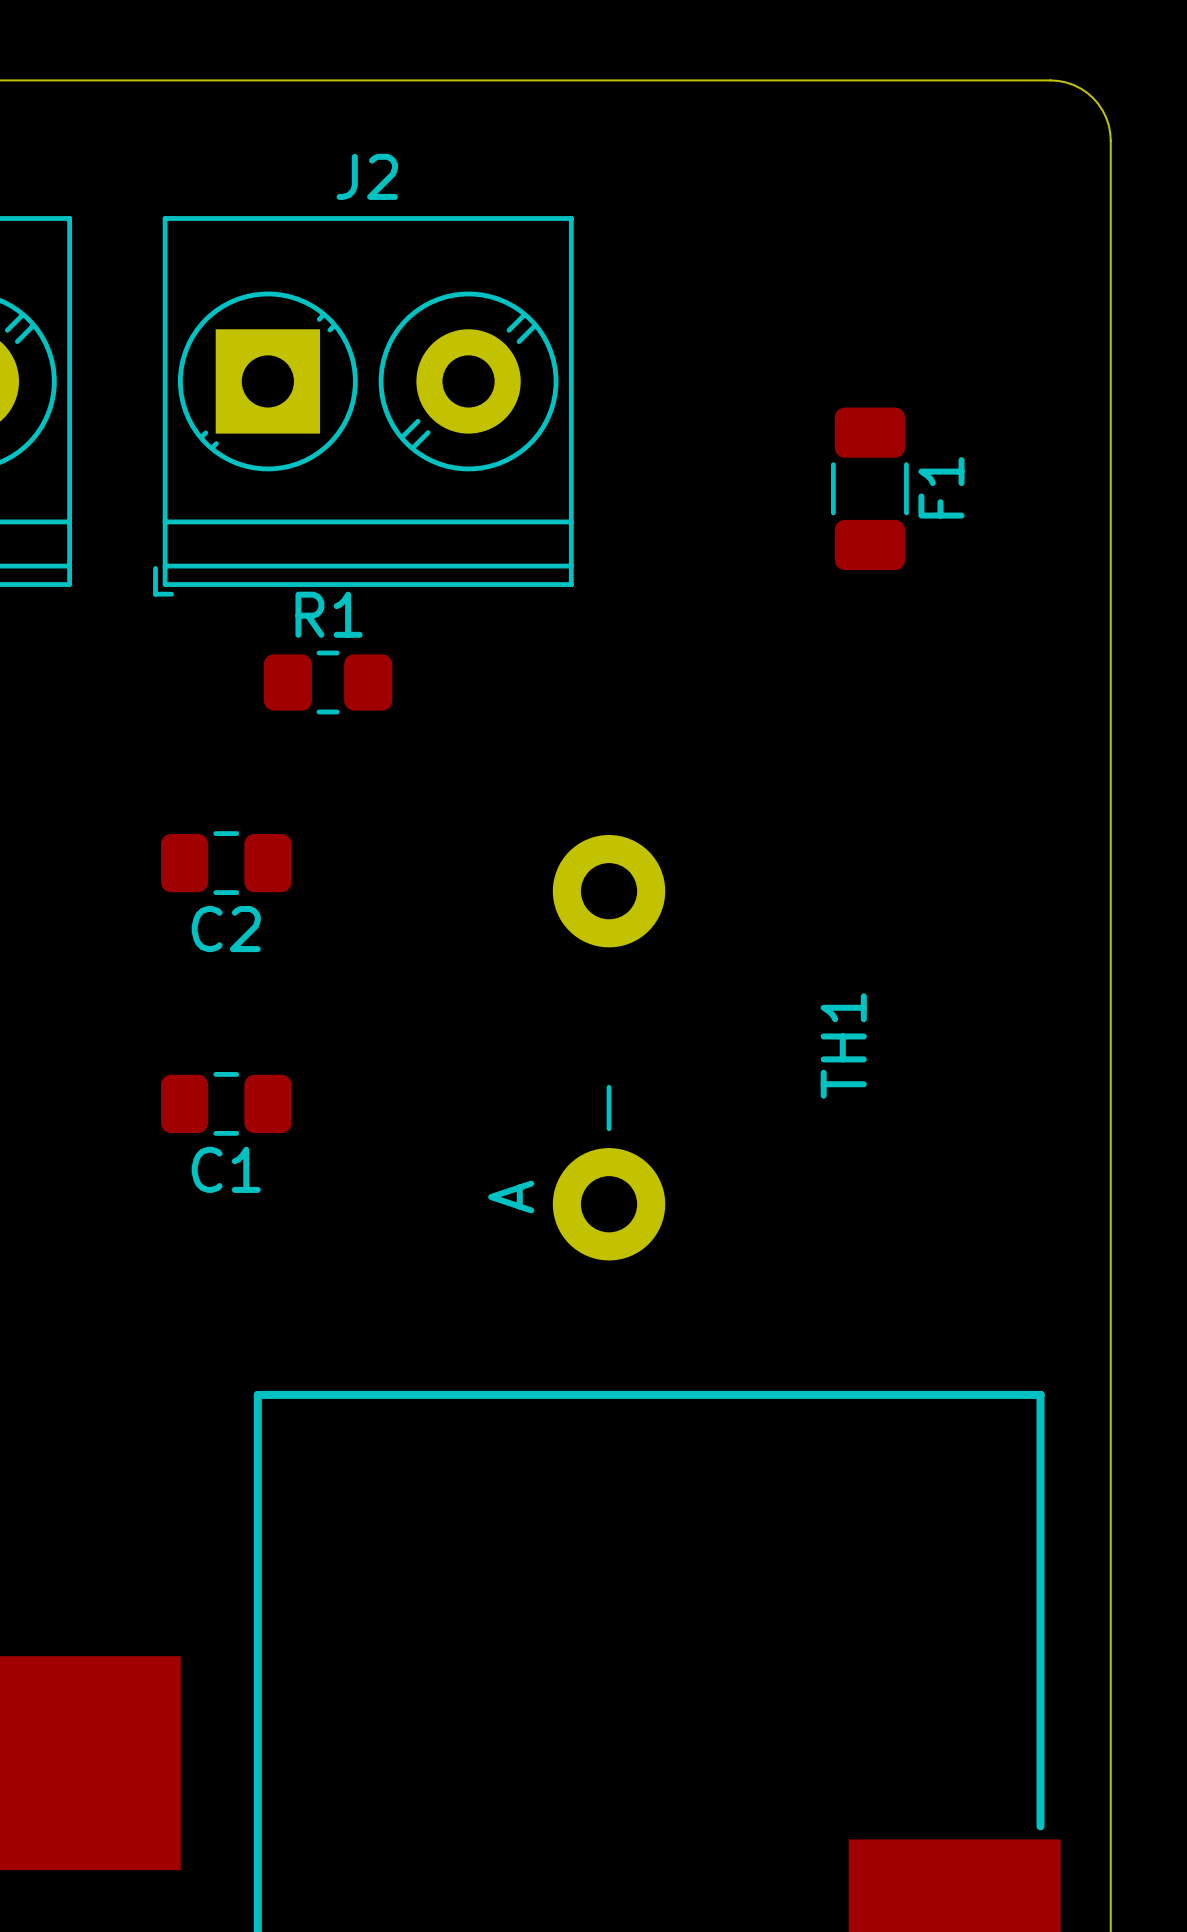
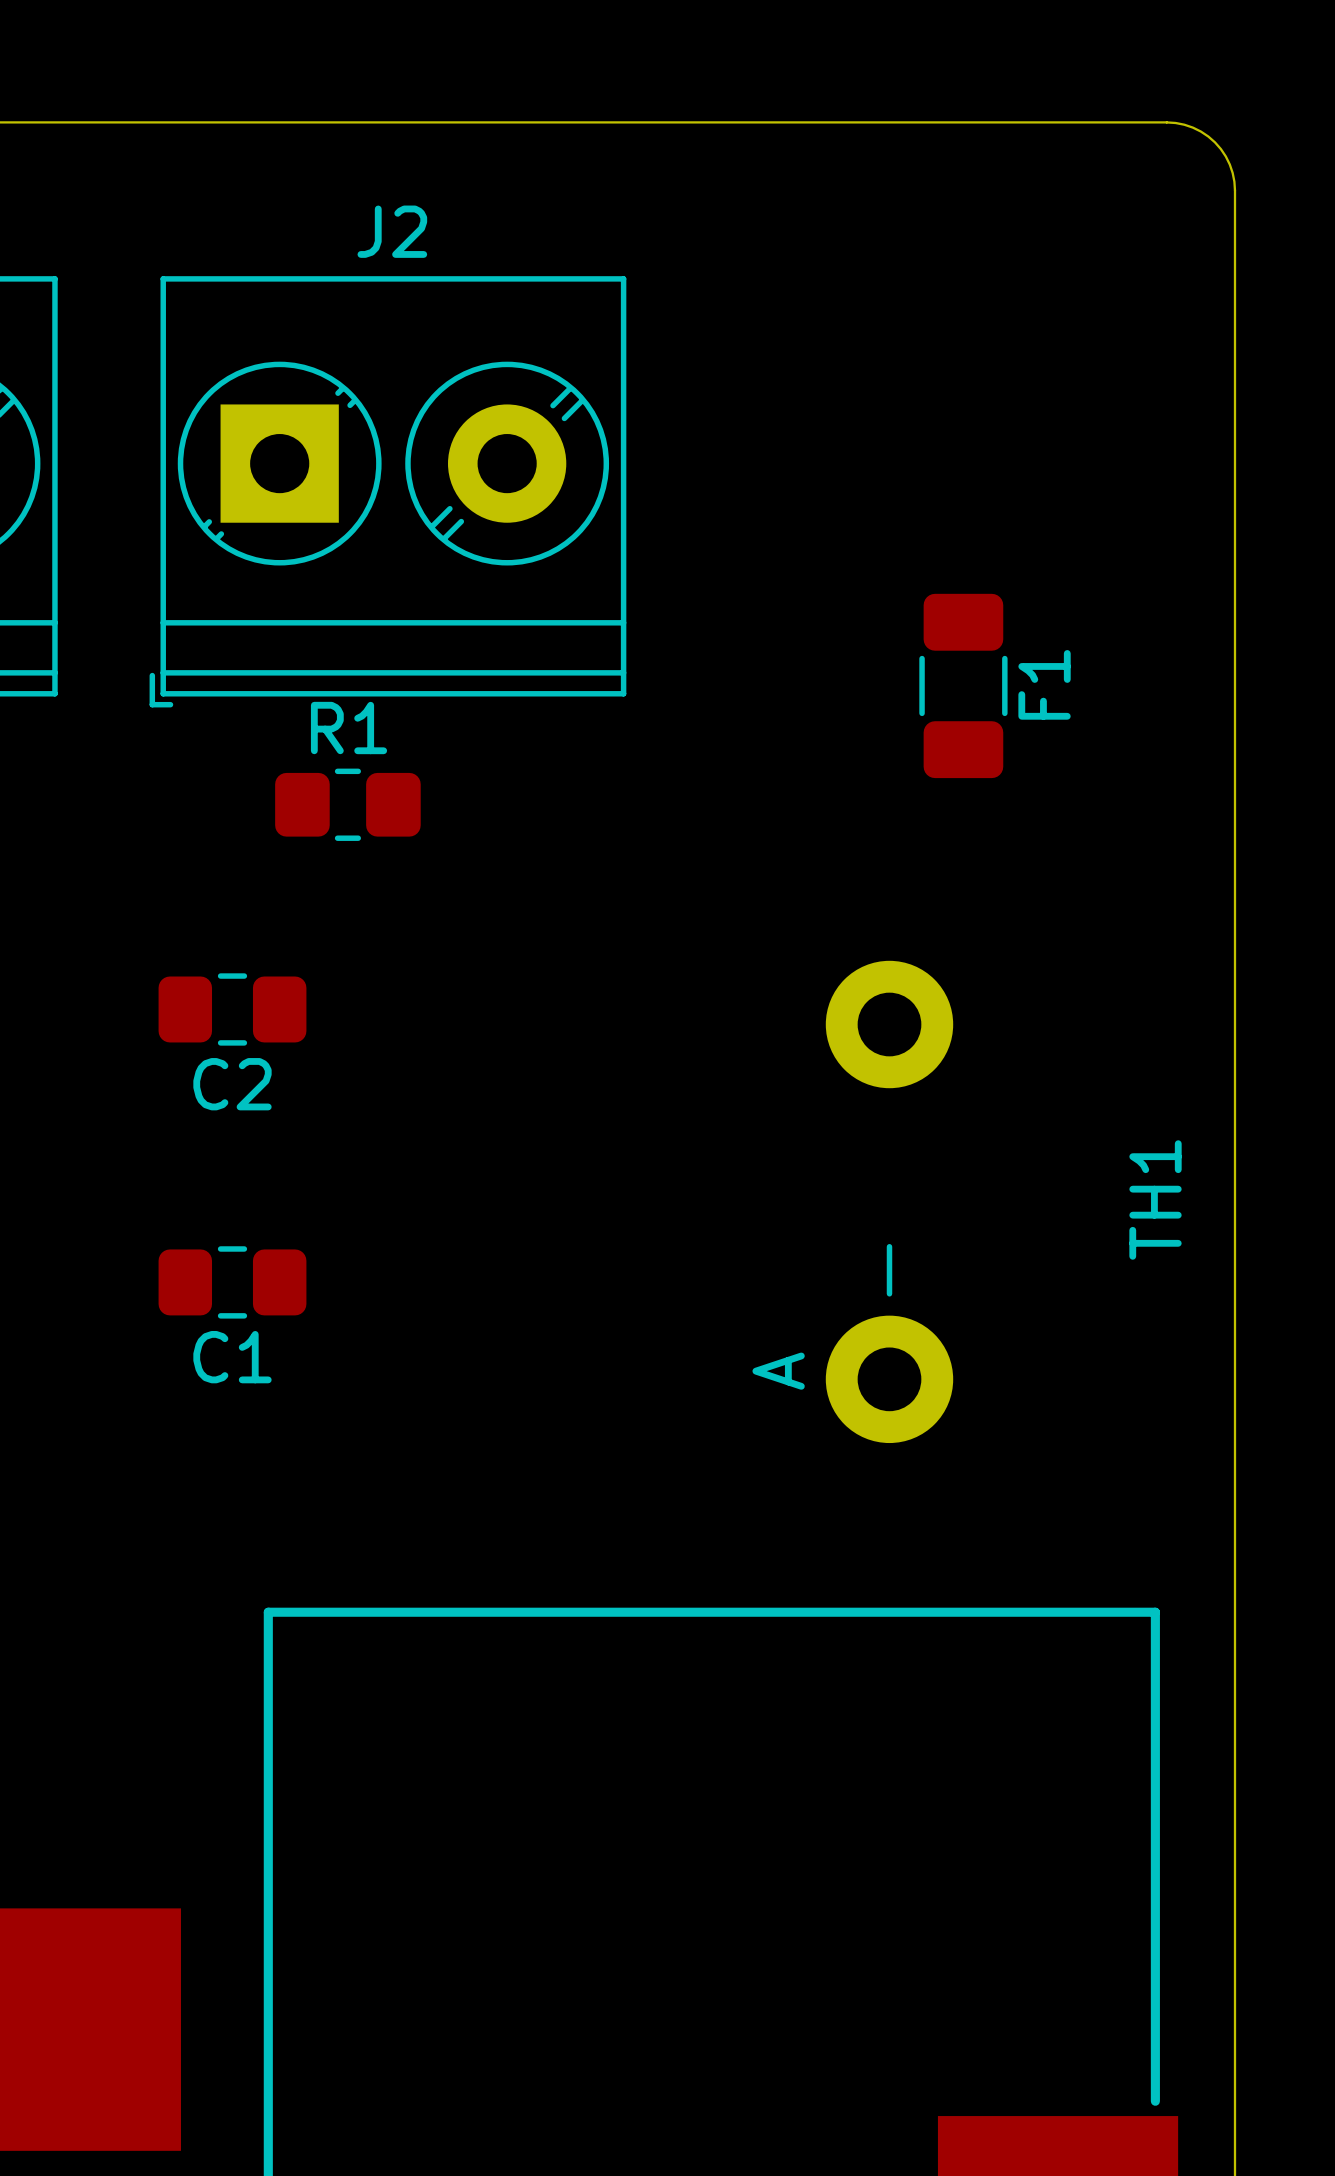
F1 position: (869, 488) -> (963, 685)
TH1 position: (609, 1047) -> (889, 1201)

